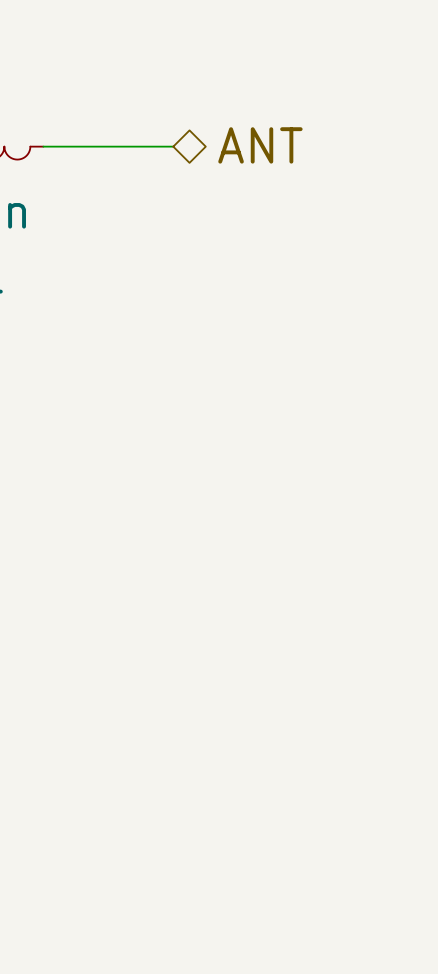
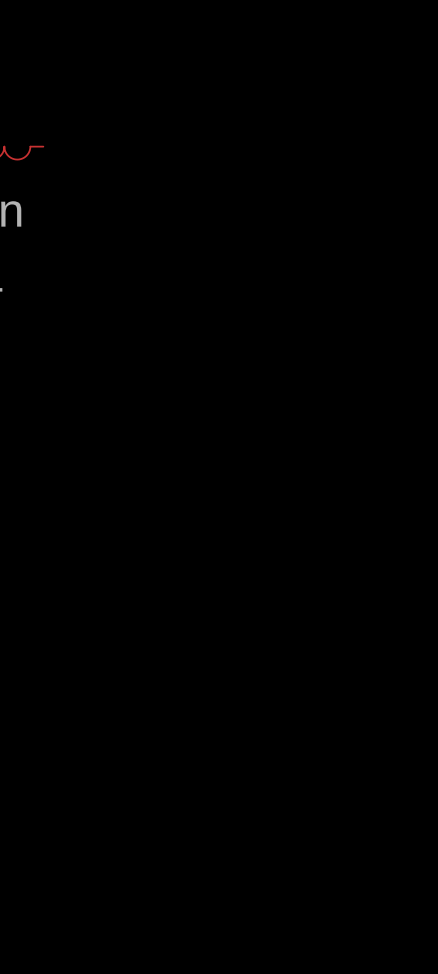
hierarchical label: ANT (260, 145) -> none
wire: (43, 146) (173, 146) -> none

